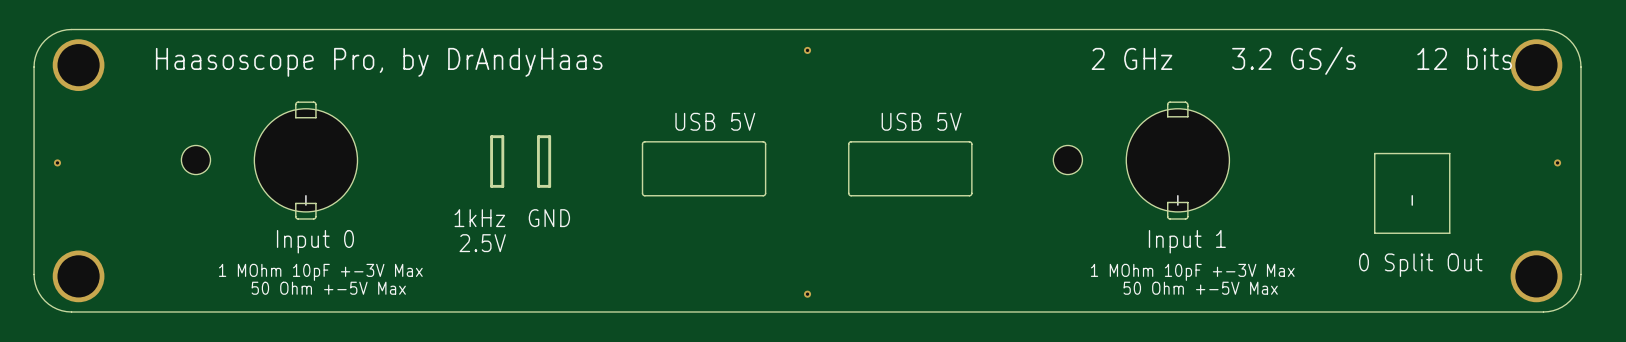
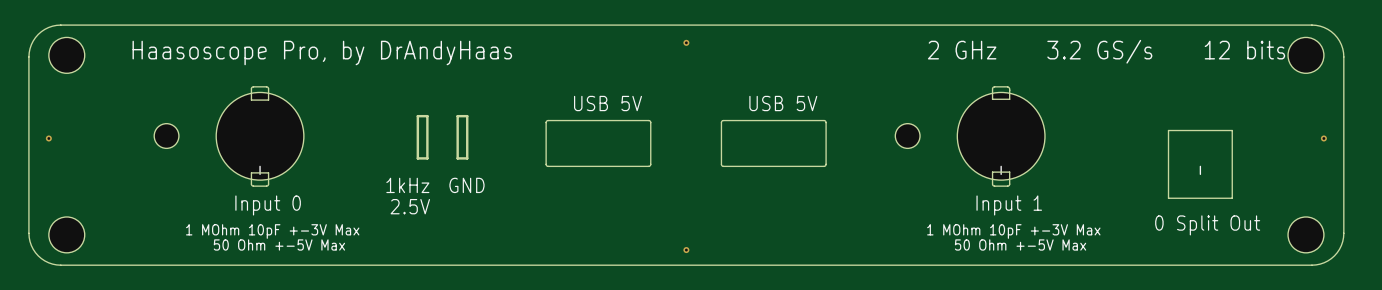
via: (78, 65) -> none
hole: none -> (66, 55)
via: (1536, 65) -> none
hole: none -> (1305, 55)
via: (78, 276) -> none
hole: none -> (66, 234)
via: (1536, 276) -> none
hole: none -> (1305, 234)

